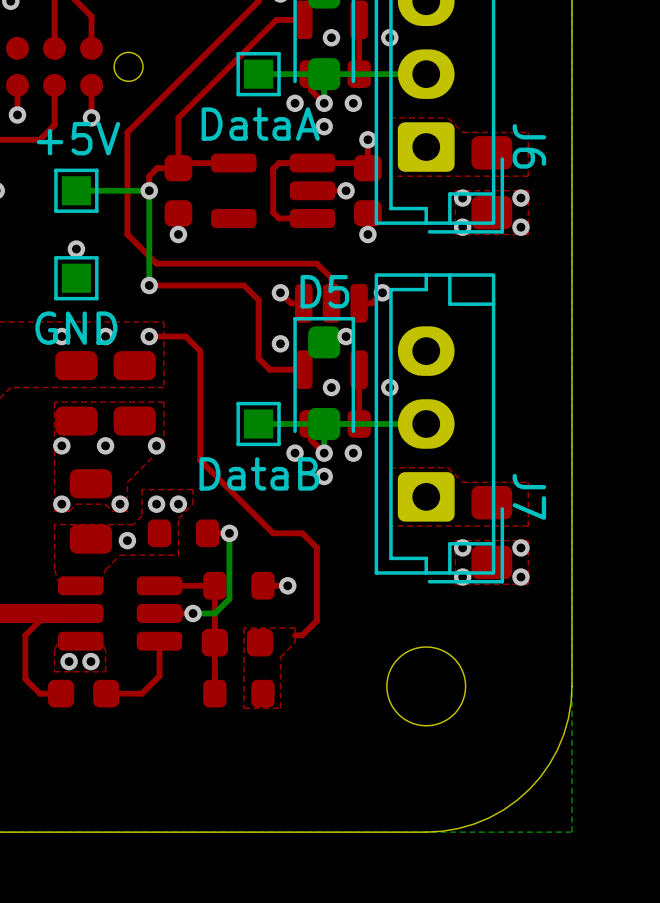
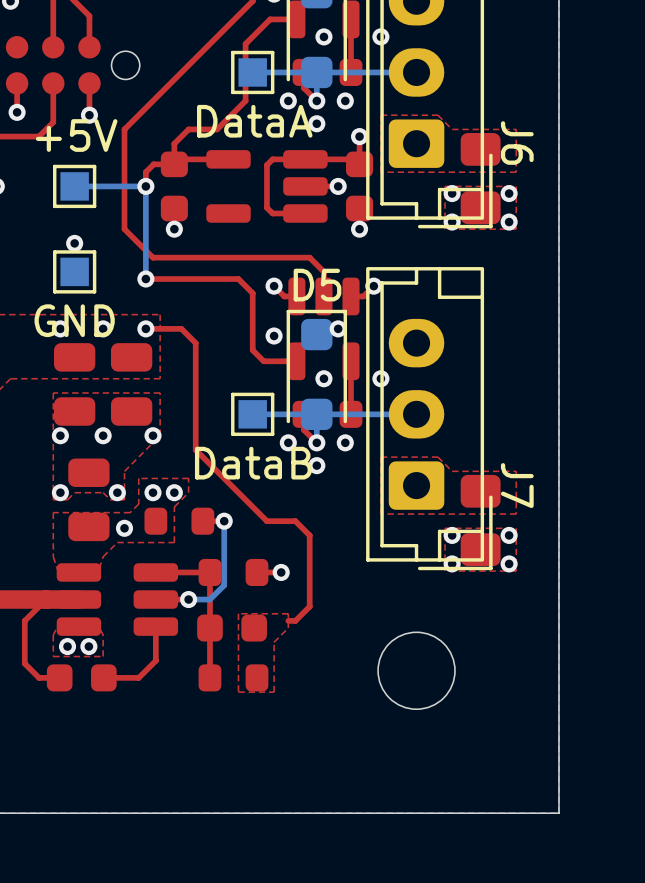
top track: (251, 45) (178, 117) (178, 147) -> (245, 43) (245, 100) (217, 129) (188, 129) (174, 143)
board edge: (572, 686) (571, 702) (563, 734) (549, 763) (529, 789) (503, 809) (474, 823) (458, 828) (426, 832) -> (558, 670) (558, 813) (416, 813)

